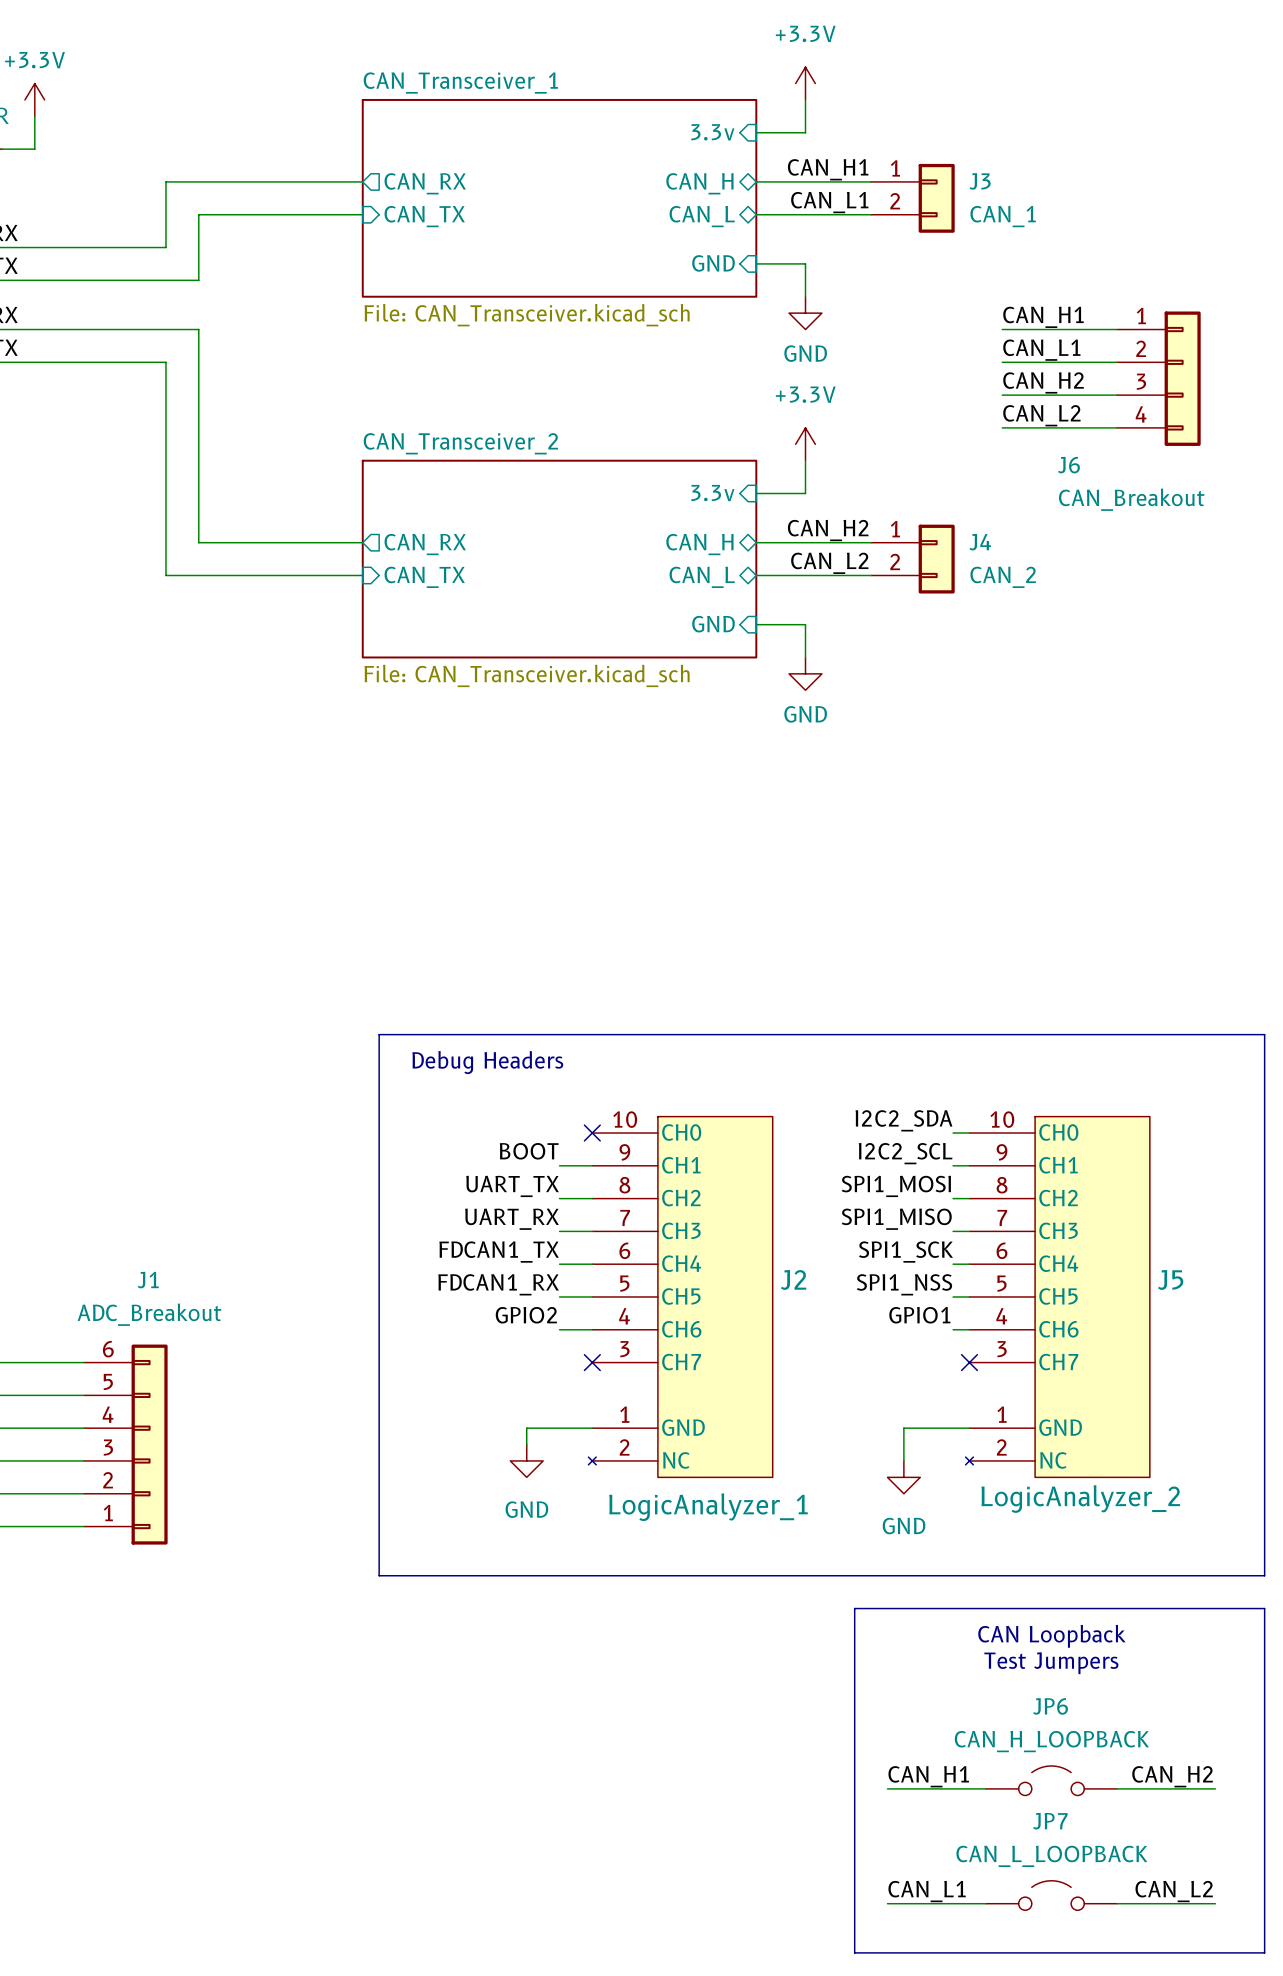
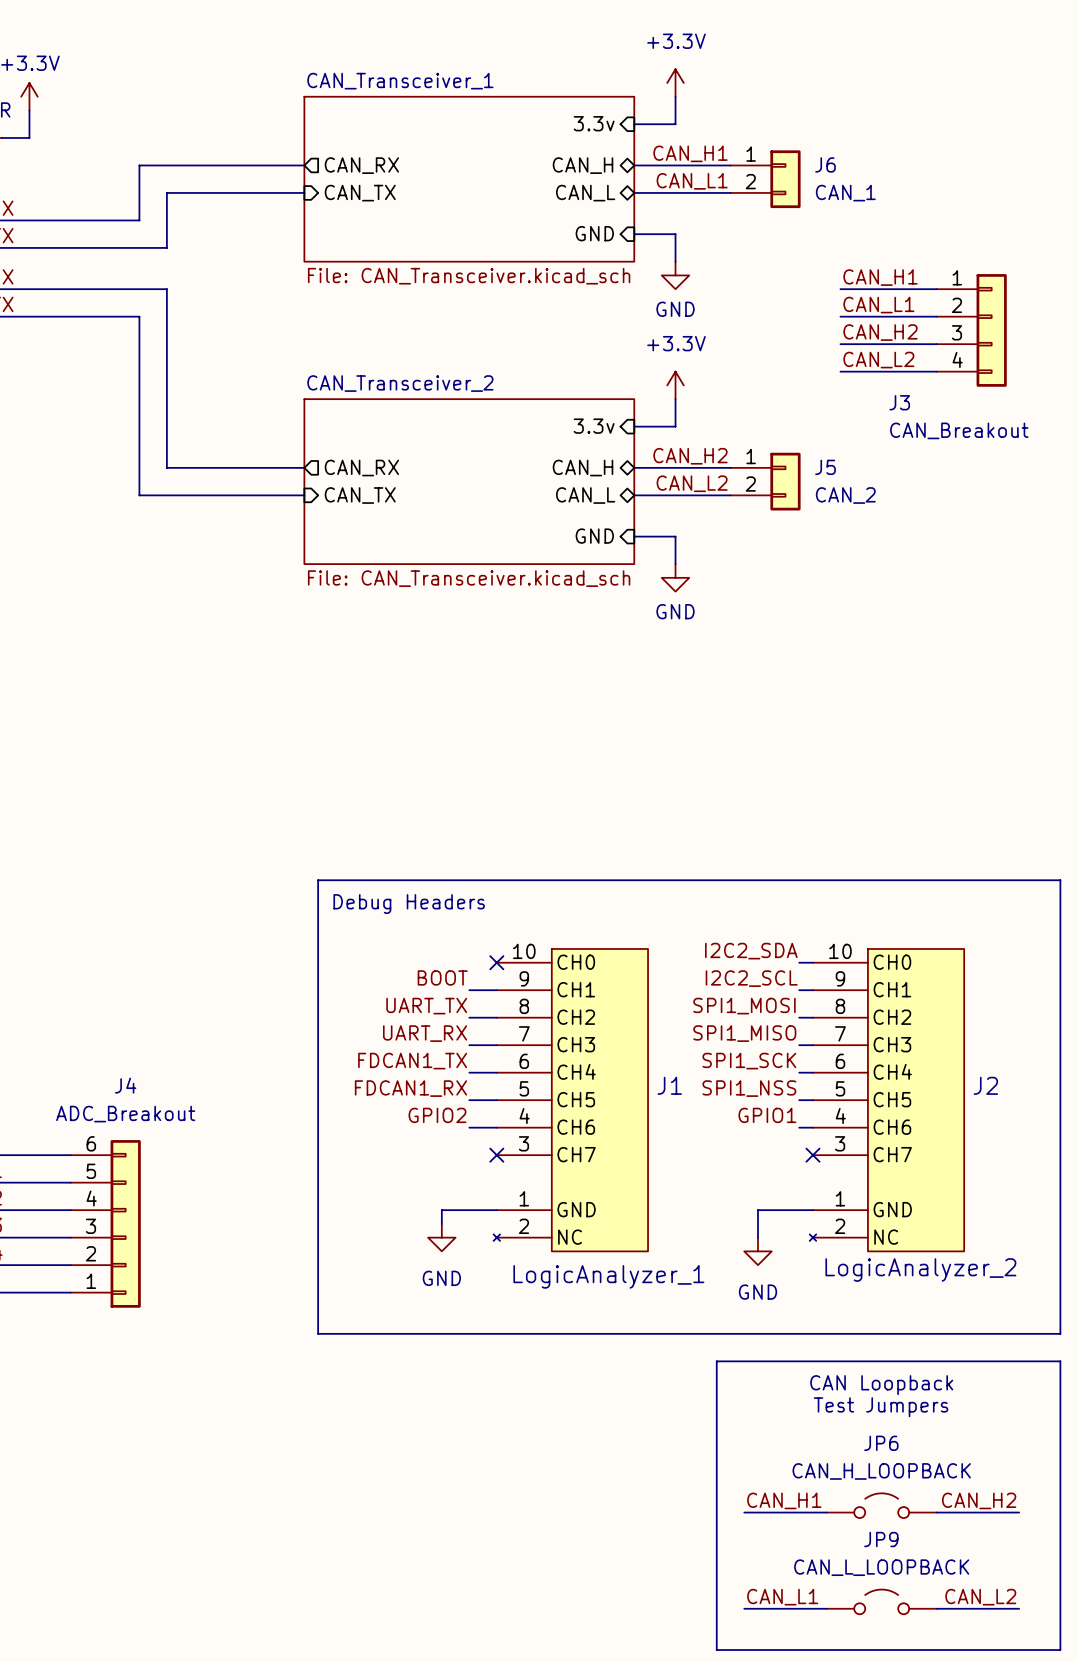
J3 name: J3 (980, 181) -> J6 (825, 164)
J6 name: J6 (1068, 465) -> J3 (899, 402)
J4 name: J4 (980, 542) -> J5 (825, 467)
J2 name: J2 (793, 1279) -> J1 (669, 1085)
J5 name: J5 (1170, 1279) -> J2 (985, 1085)
J1 name: J1 (148, 1280) -> J4 (125, 1085)
JP7 name: JP7 (1050, 1821) -> JP9 (881, 1539)

